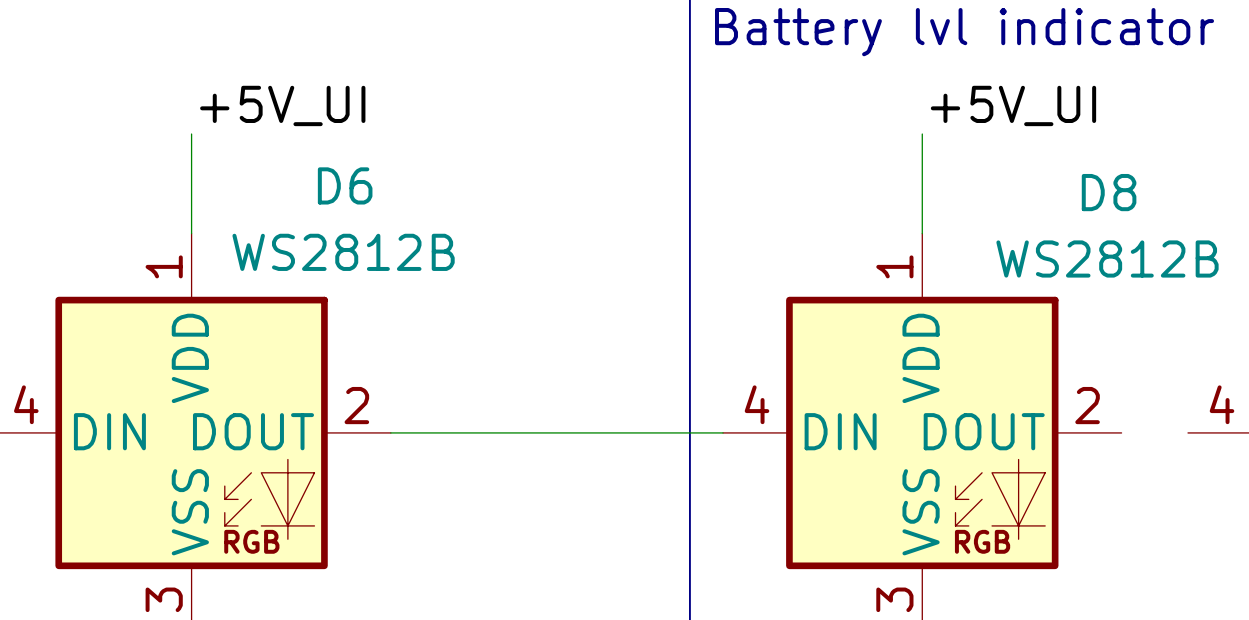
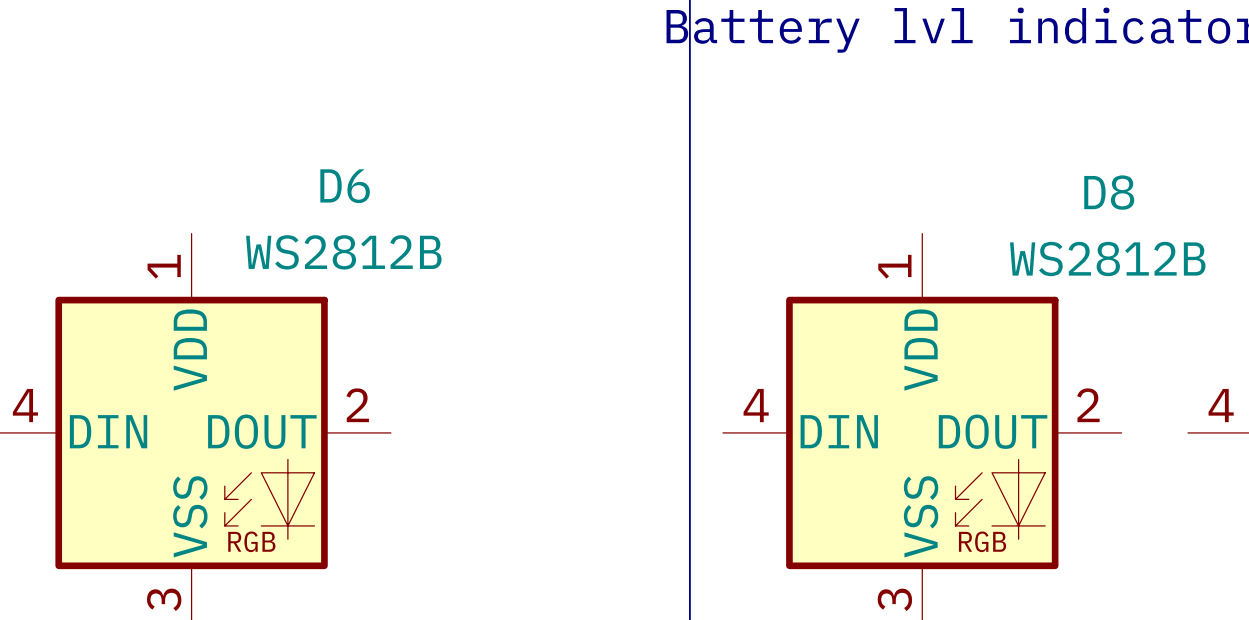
label: +5V_UI (282, 105) -> none
label: +5V_UI (1013, 105) -> none
wire: (191, 134) (191, 233) -> none
wire: (922, 134) (922, 233) -> none
wire: (390, 432) (723, 432) -> none

